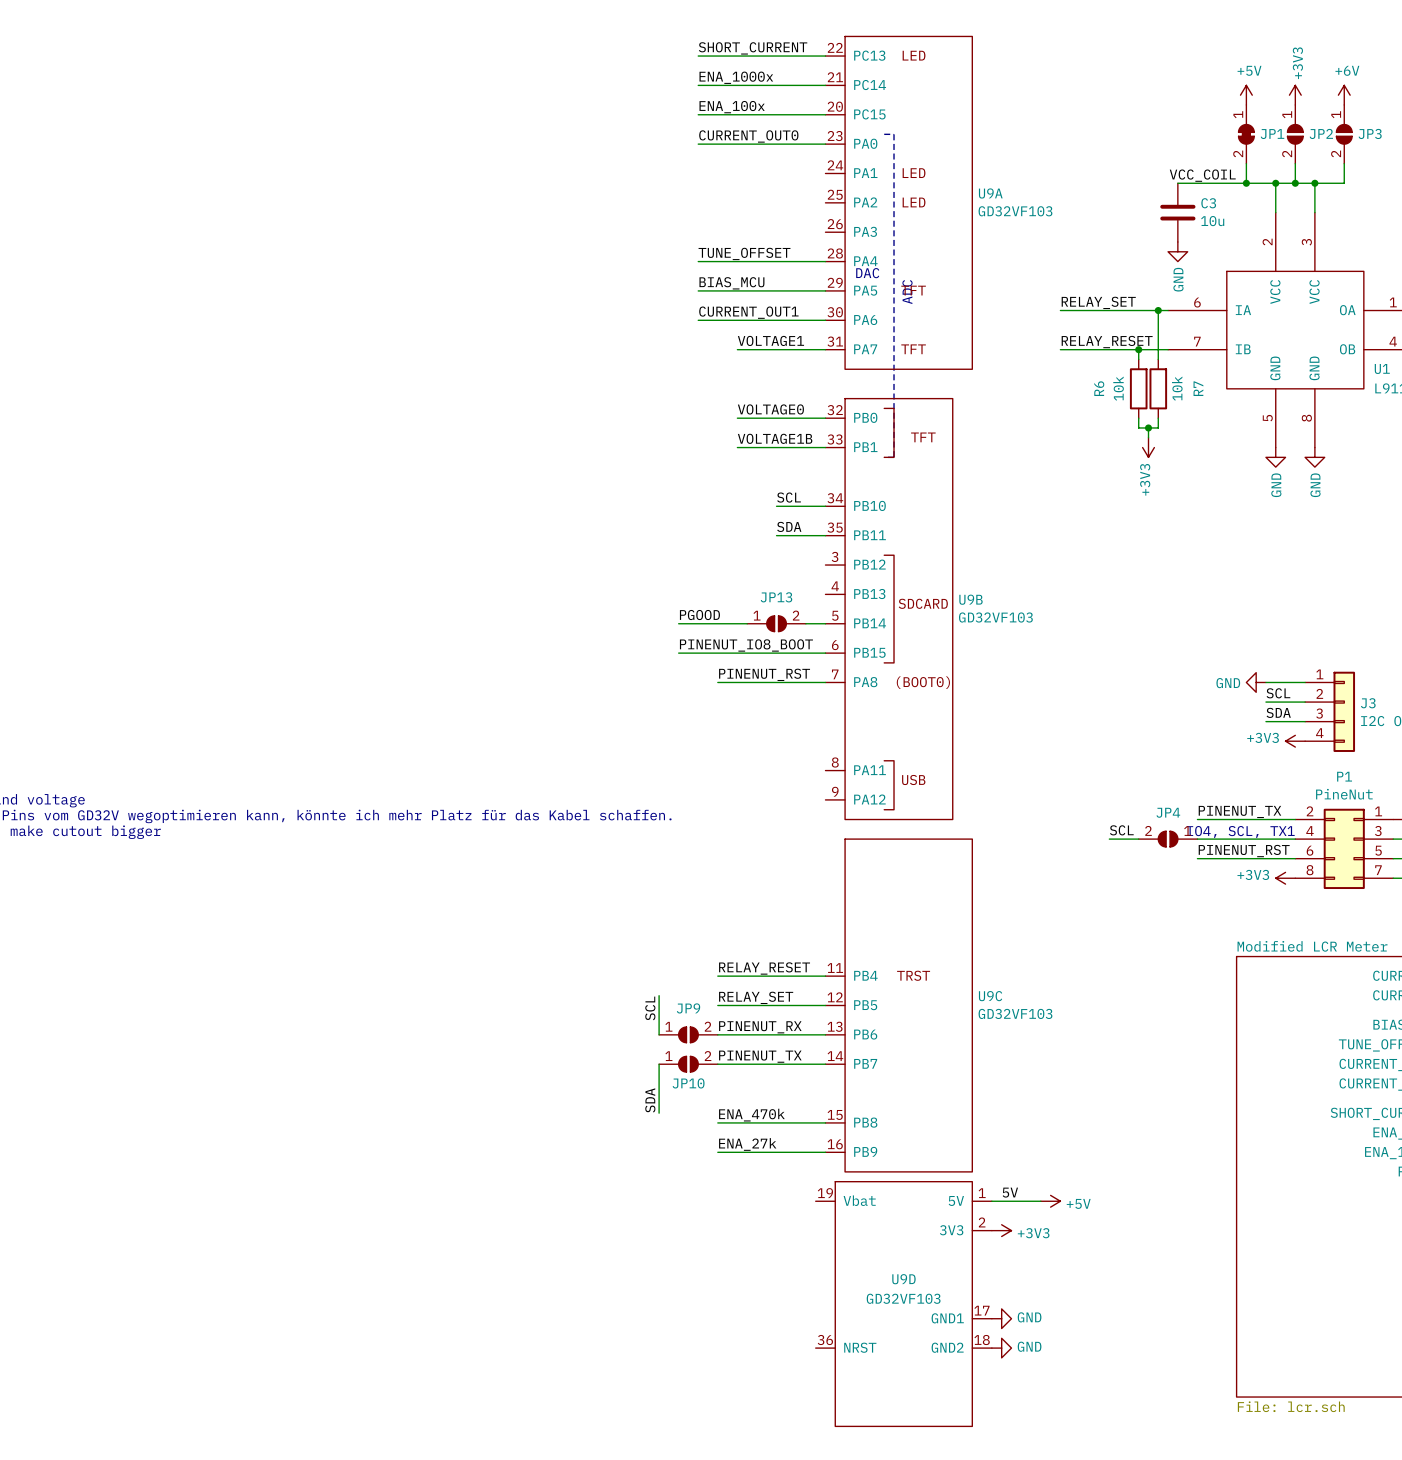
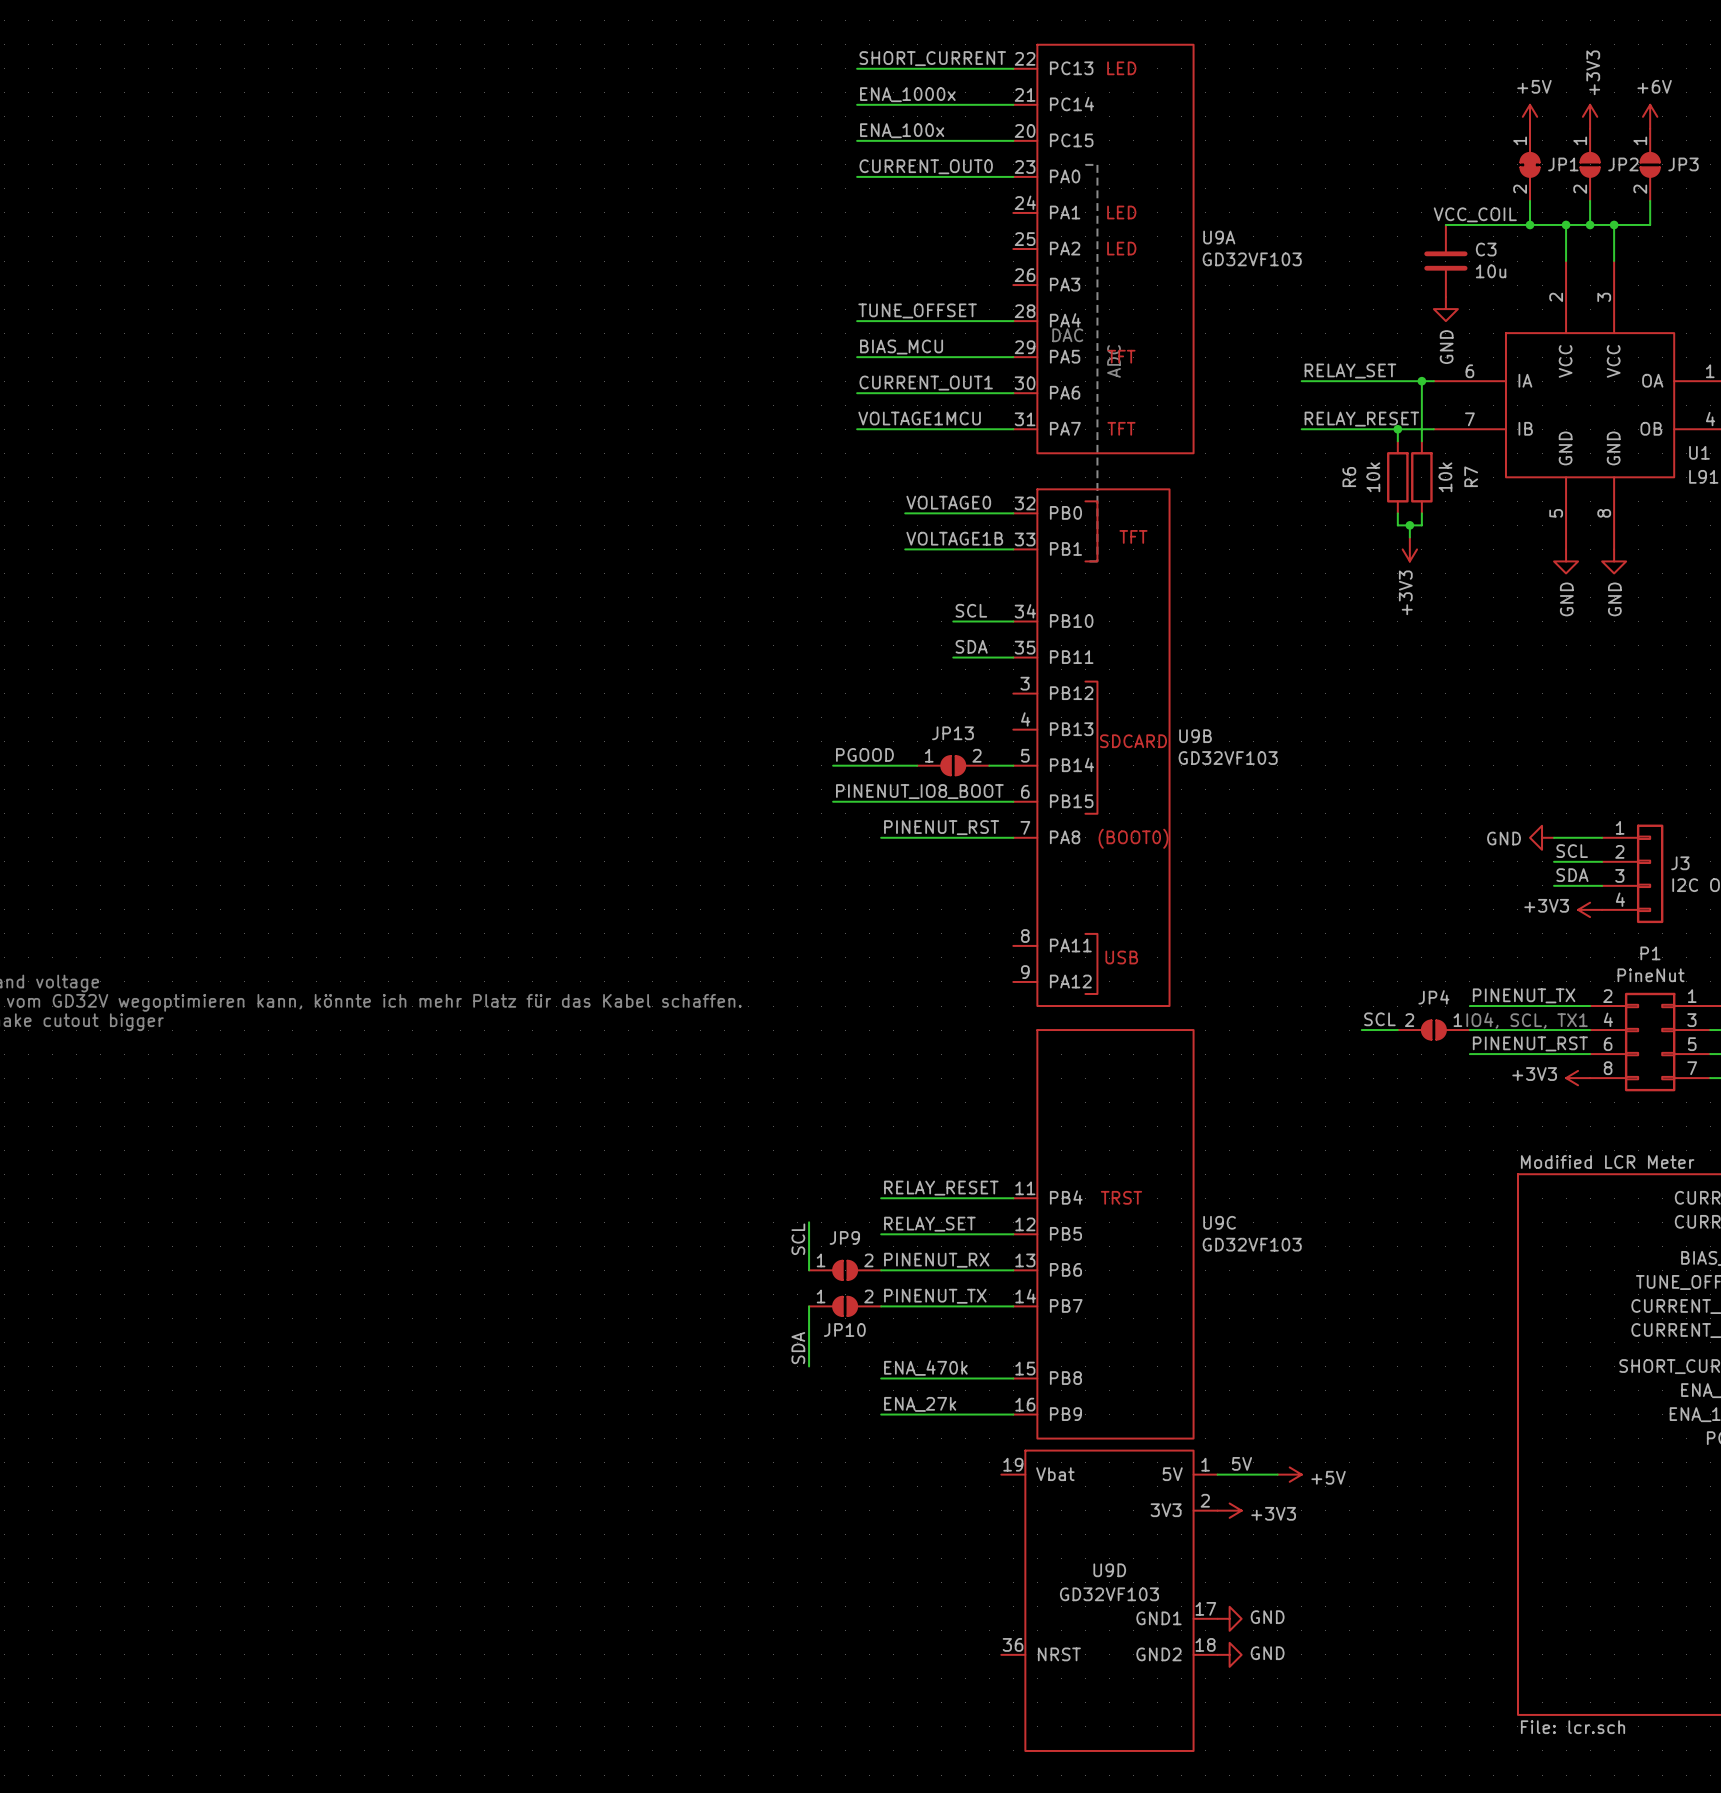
label: VOLTAGE1 (770, 340) -> VOLTAGE1MCU (919, 418)
wire: none -> (857, 429) (905, 429)

